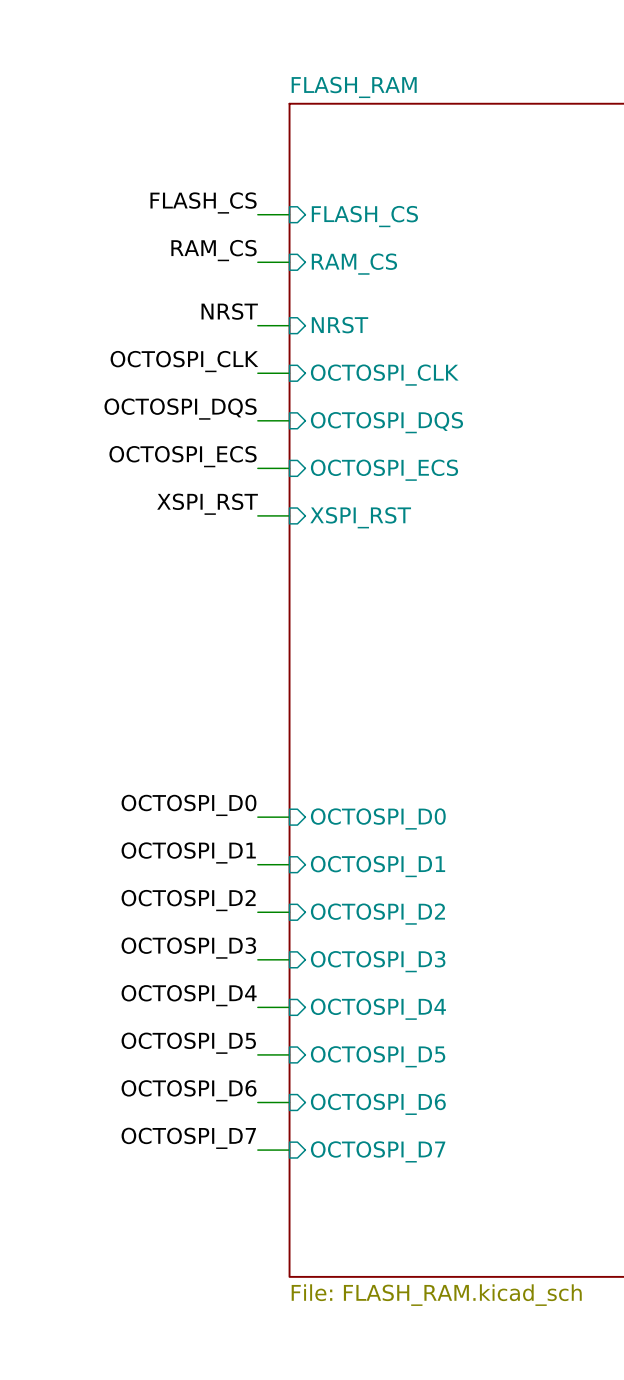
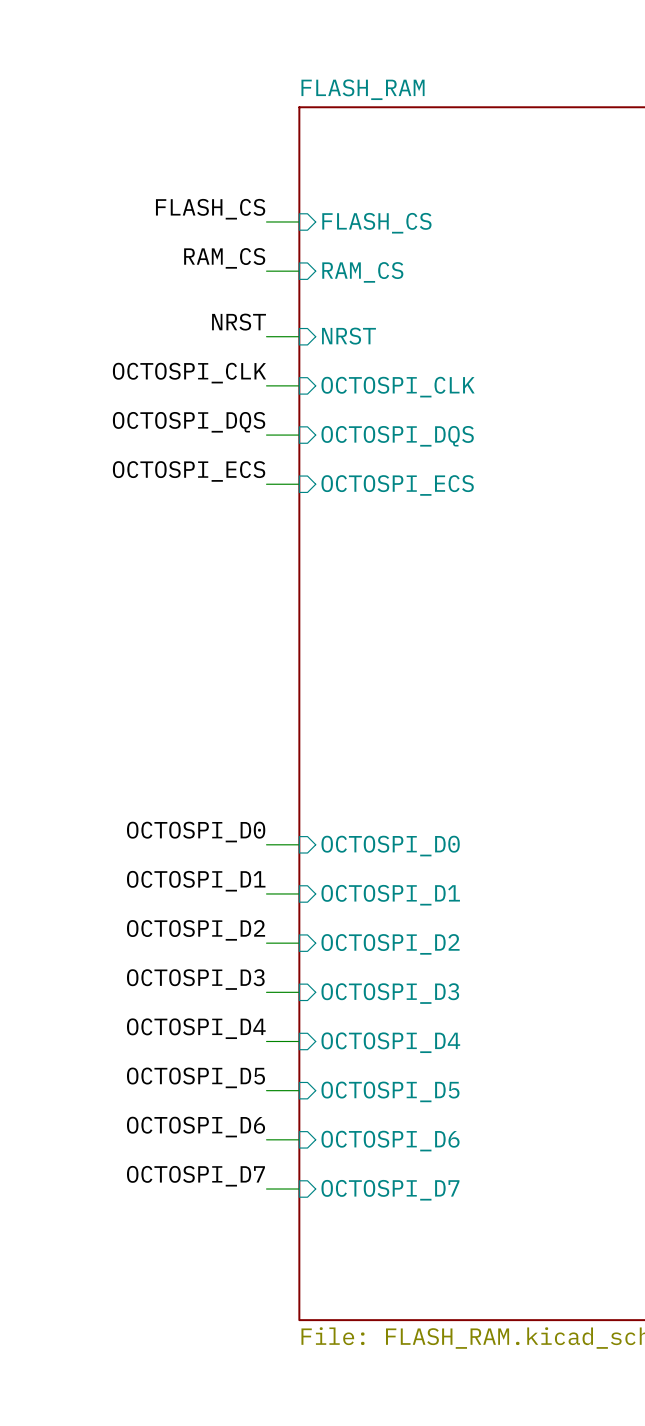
label: XSPI_RST (207, 504) -> none
wire: (257, 515) (289, 515) -> none
sheet pin: XSPI_RST (360, 517) -> none

